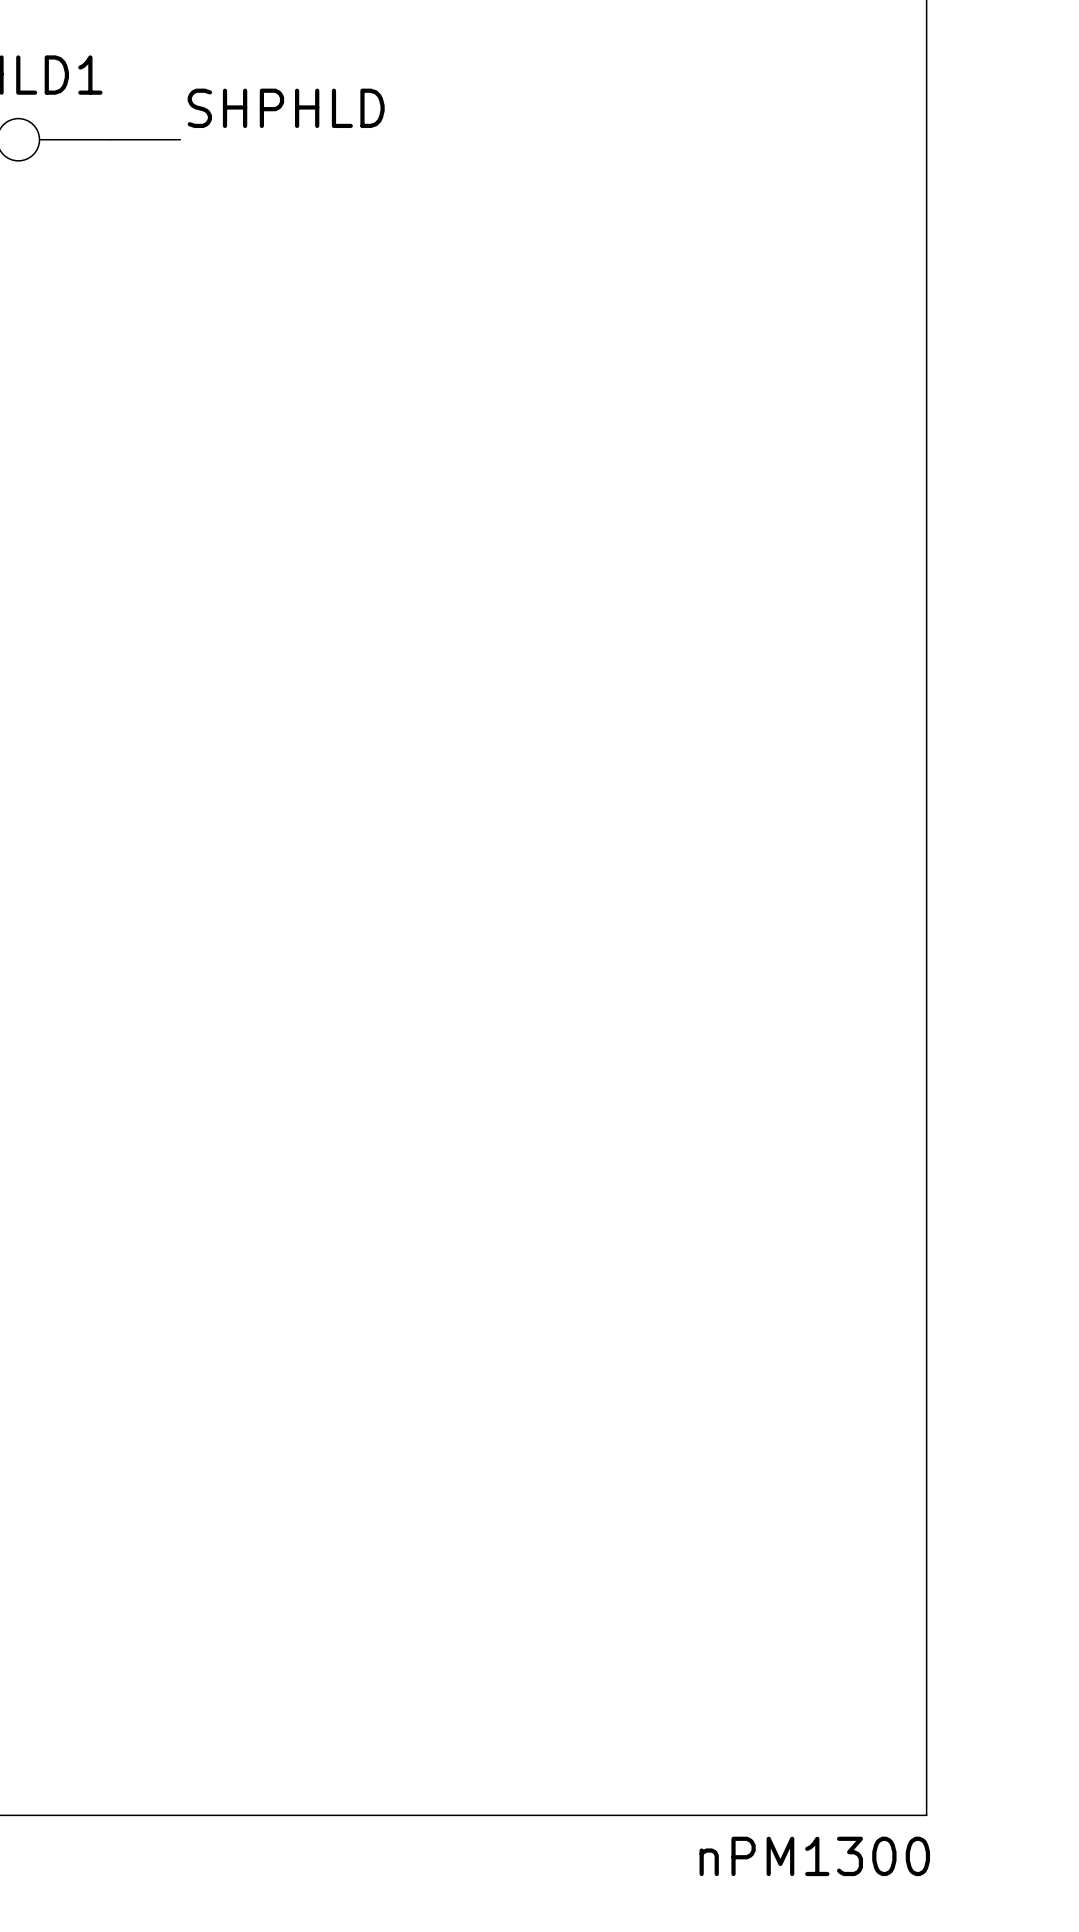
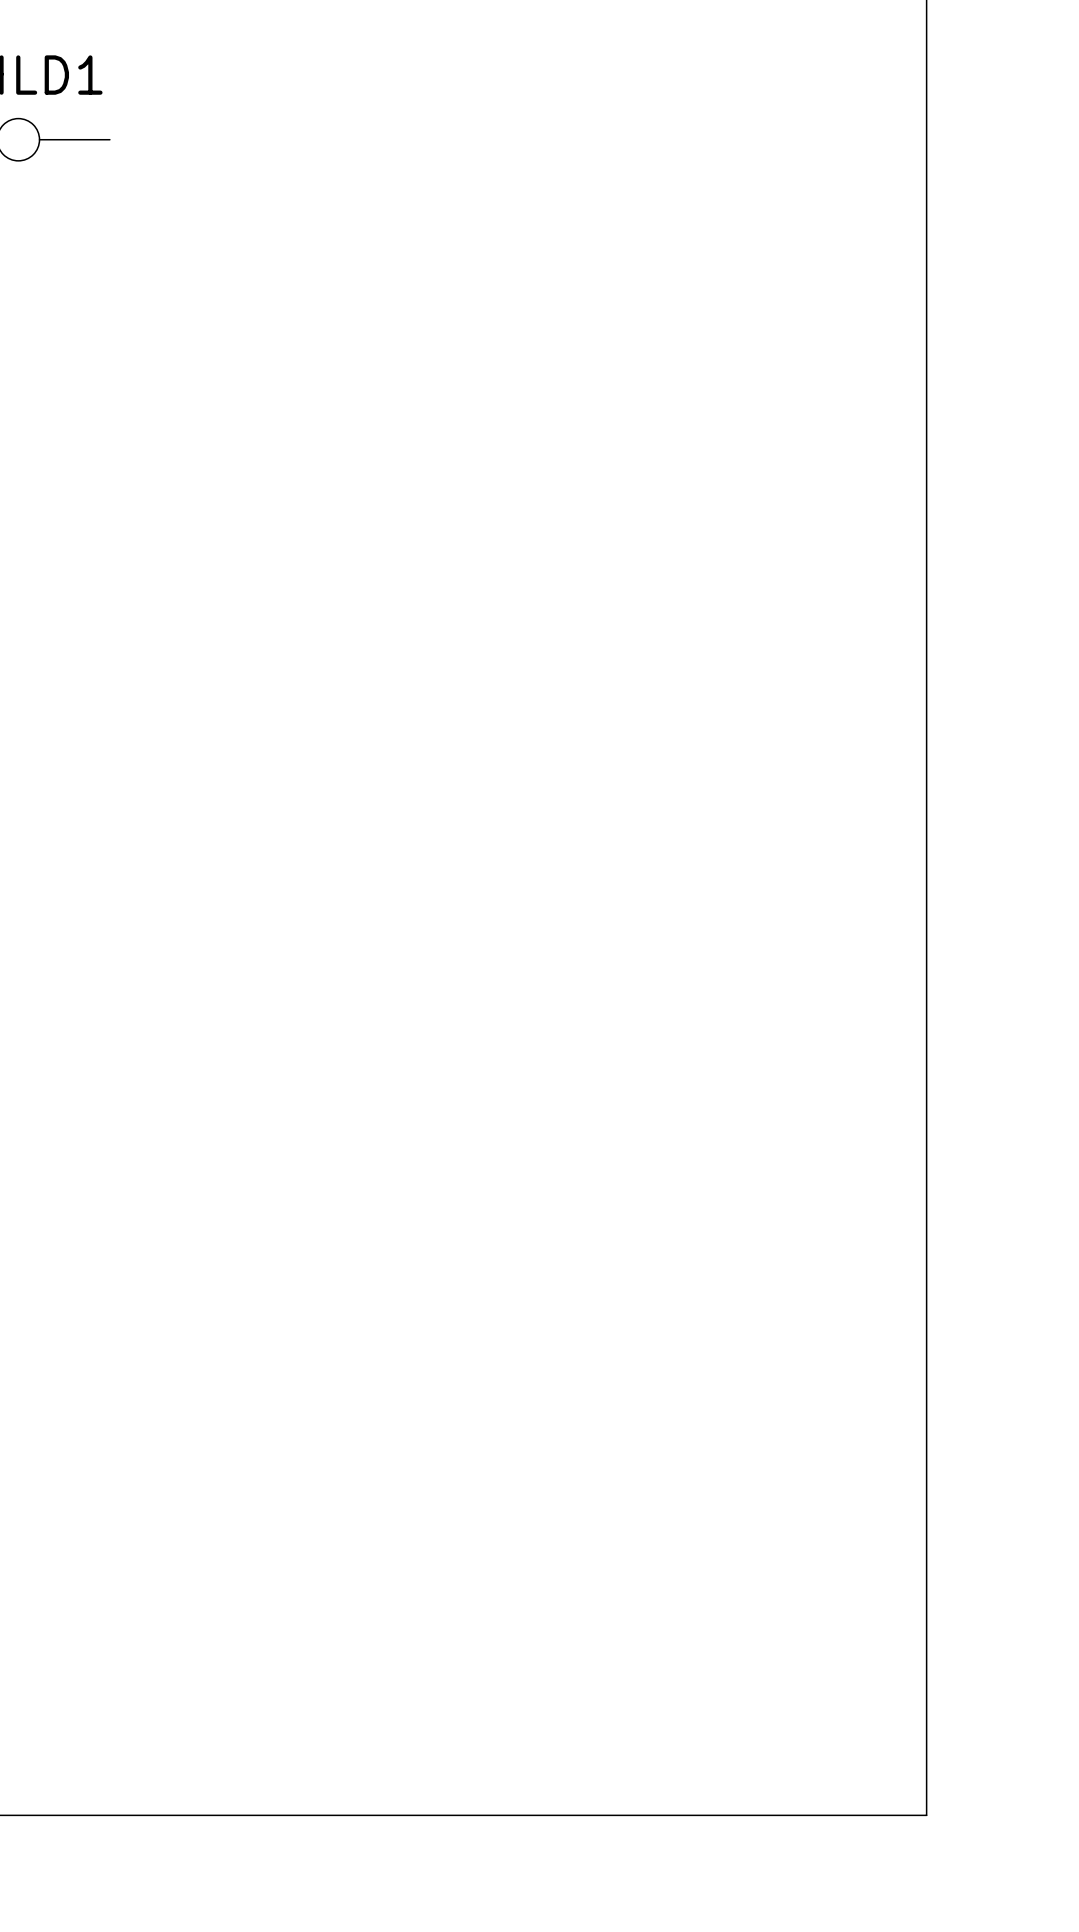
label: SHPHLD (286, 108) -> none
wire: (109, 139) (180, 139) -> none
text: nPM1300 (814, 1856) -> none

